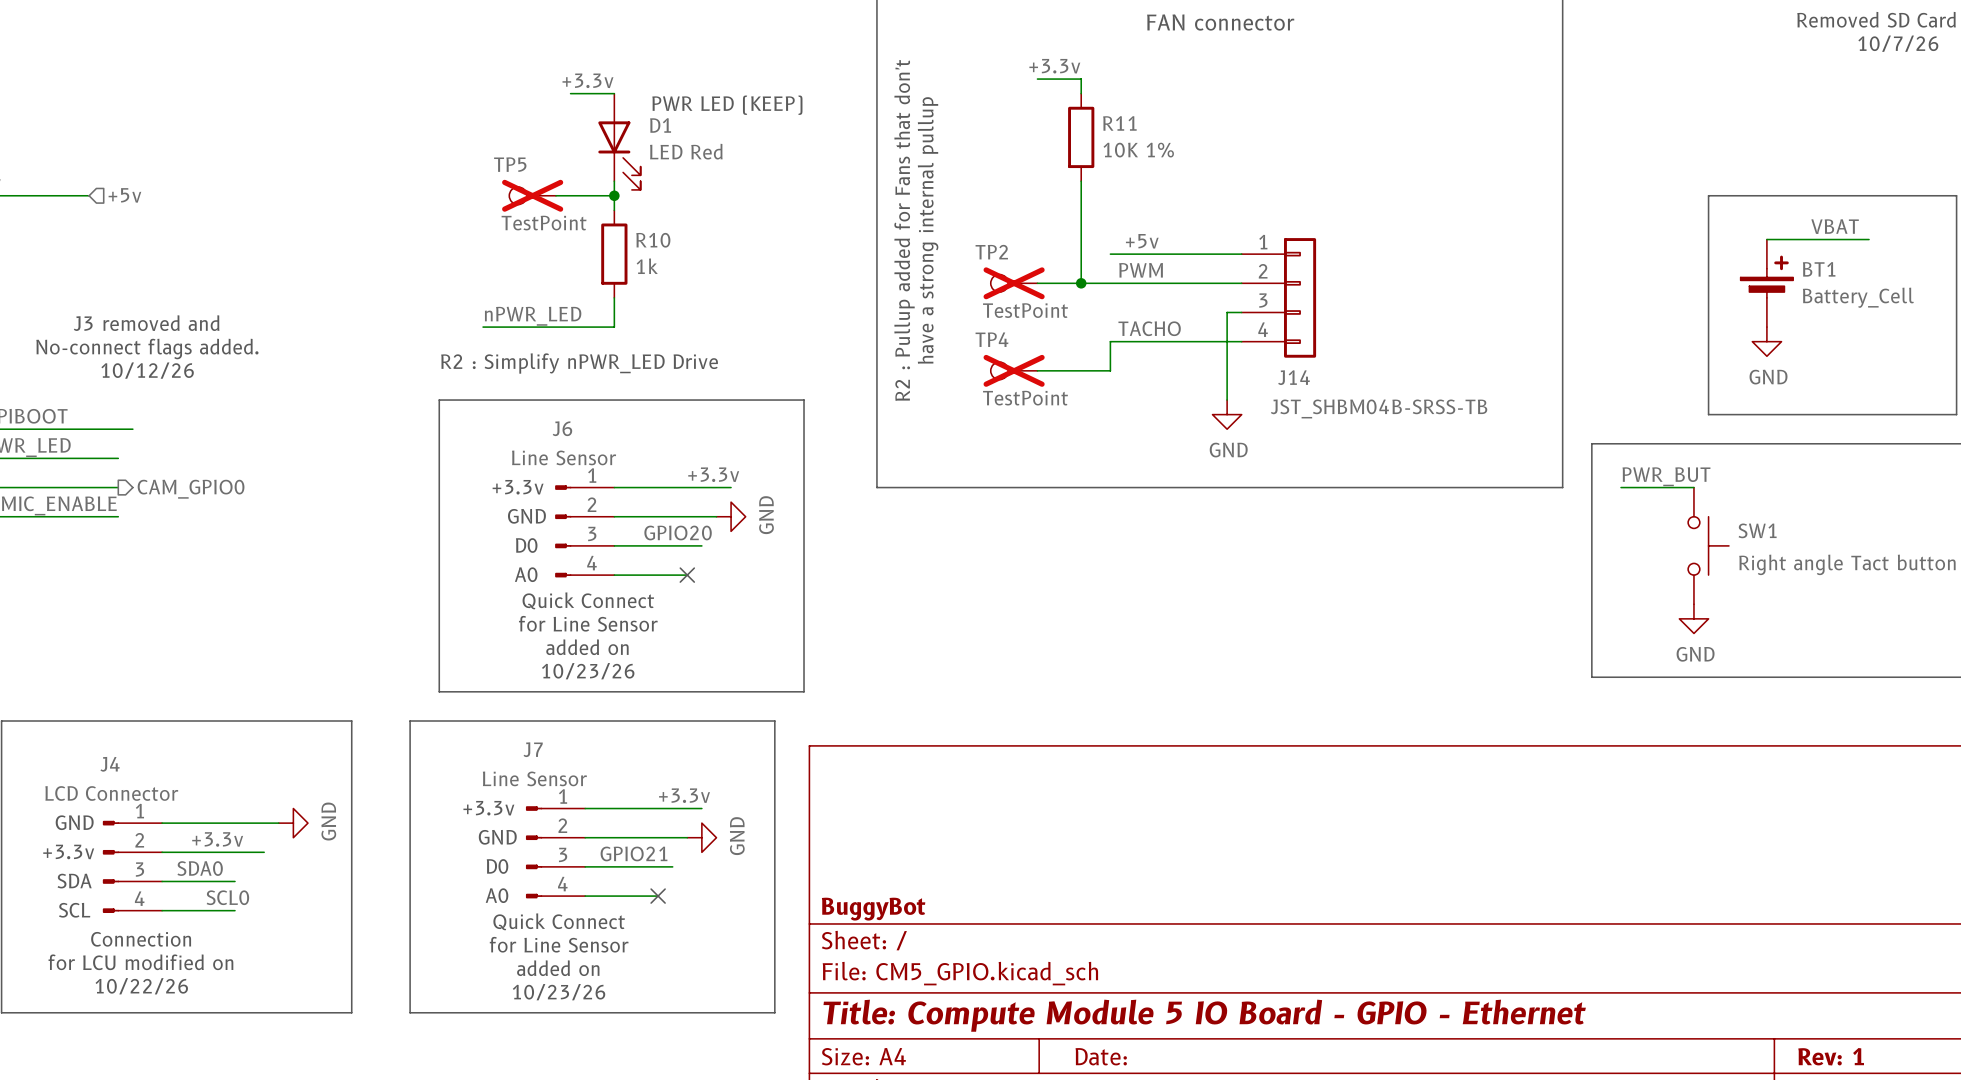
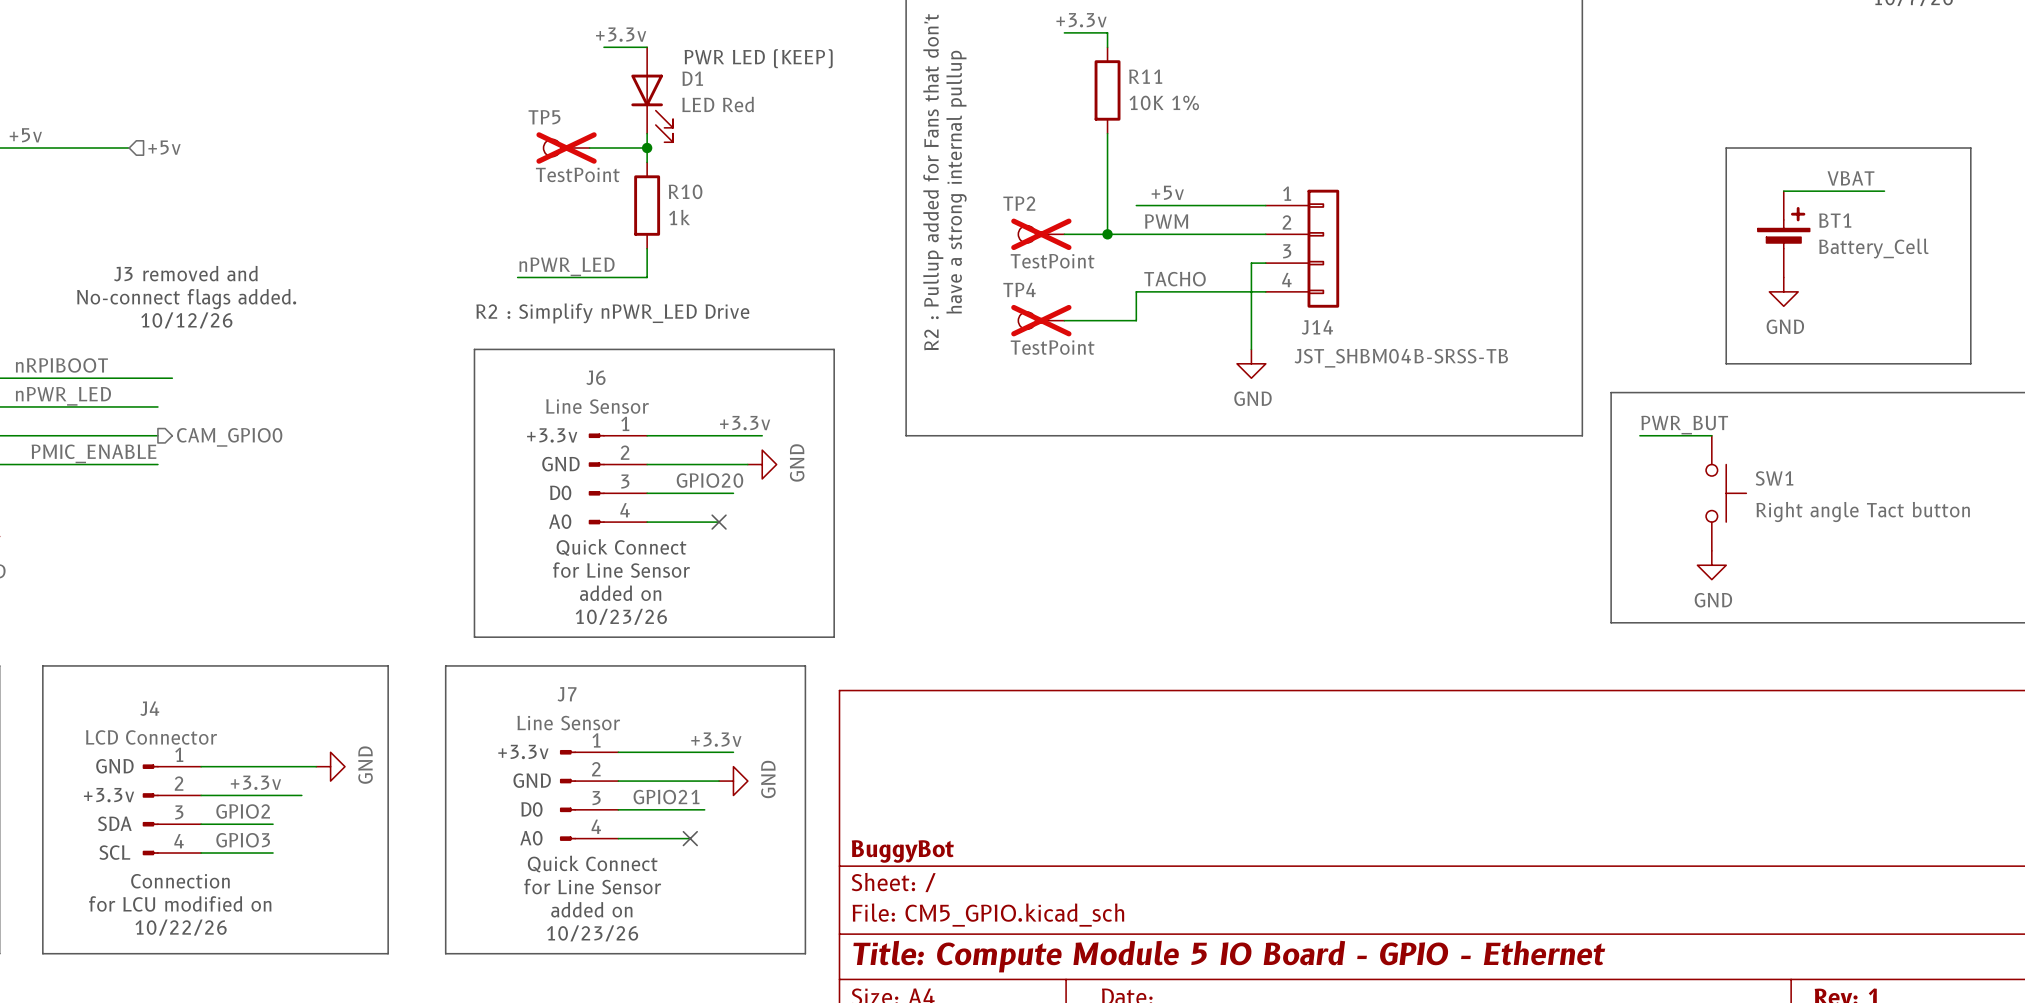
label: SDA0 (200, 868) -> GPIO2 (243, 811)
label: none -> GPIO3 (243, 840)
label: SCL0 (227, 897) -> none

